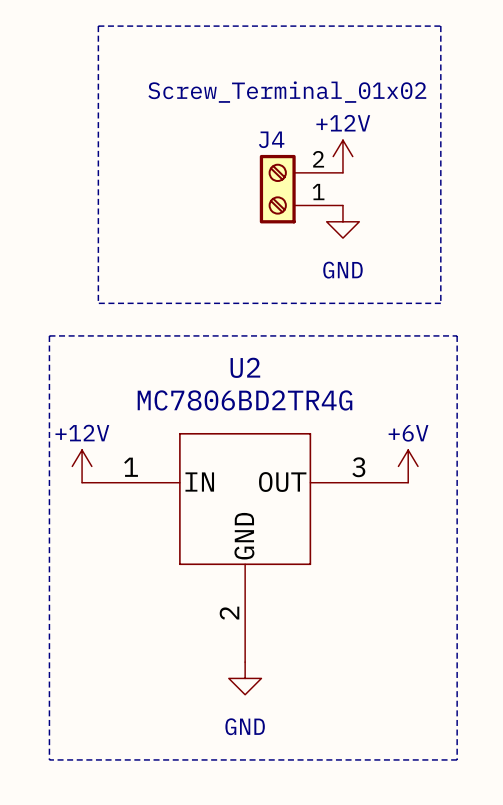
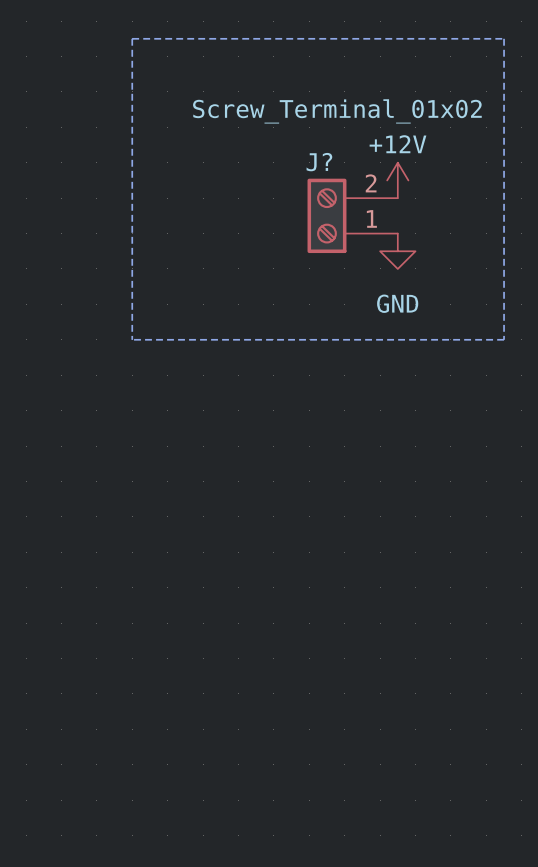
J4 name: J4 (271, 139) -> J? (319, 162)
line: (49, 335) (49, 759) (457, 759) (457, 335) (49, 335) -> none
power symbol: +12V (82, 466) -> none
power symbol: +6V (408, 466) -> none
U2: MC7806BD2TR4G (245, 547) -> none
power symbol: GND (245, 678) -> none

